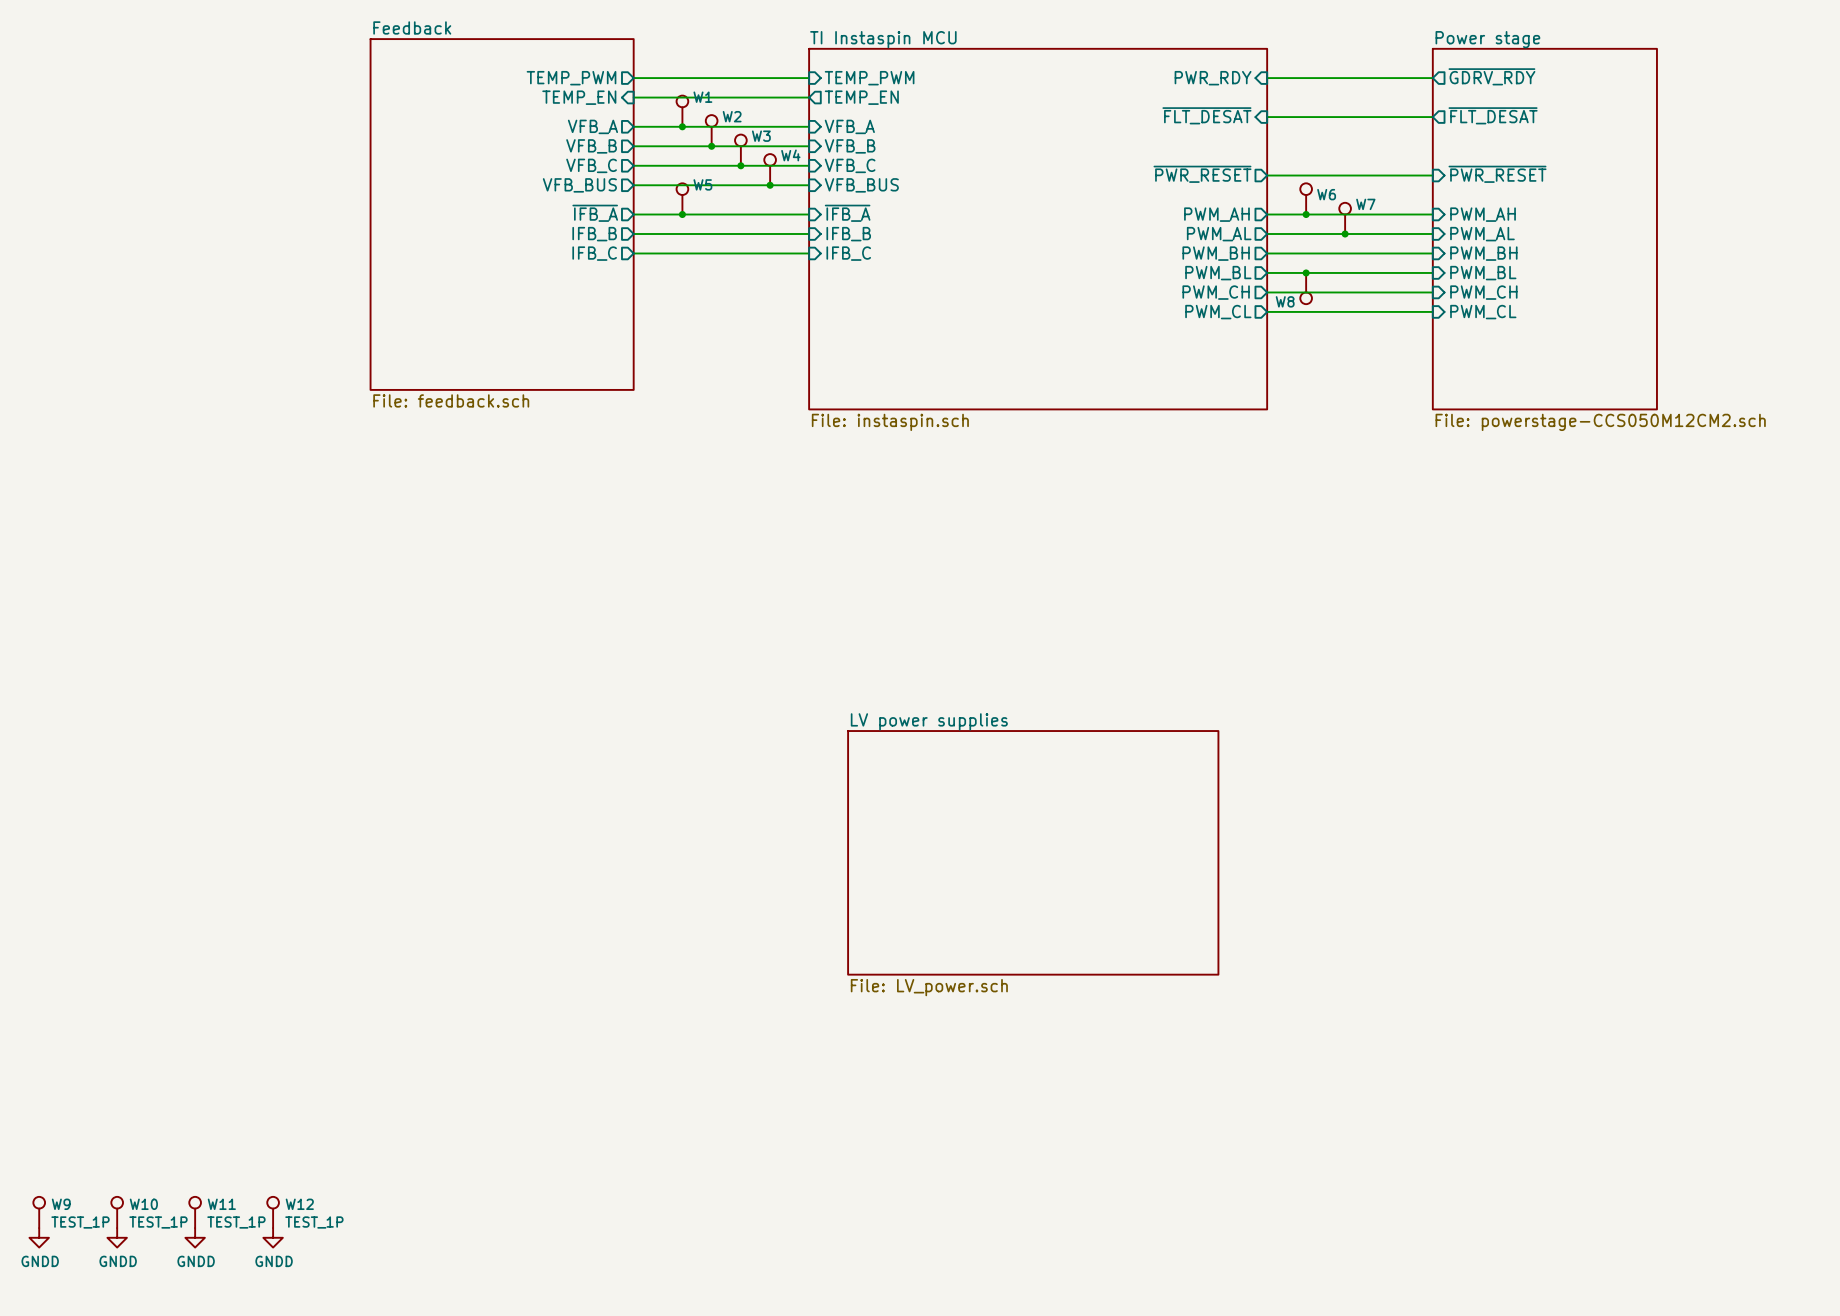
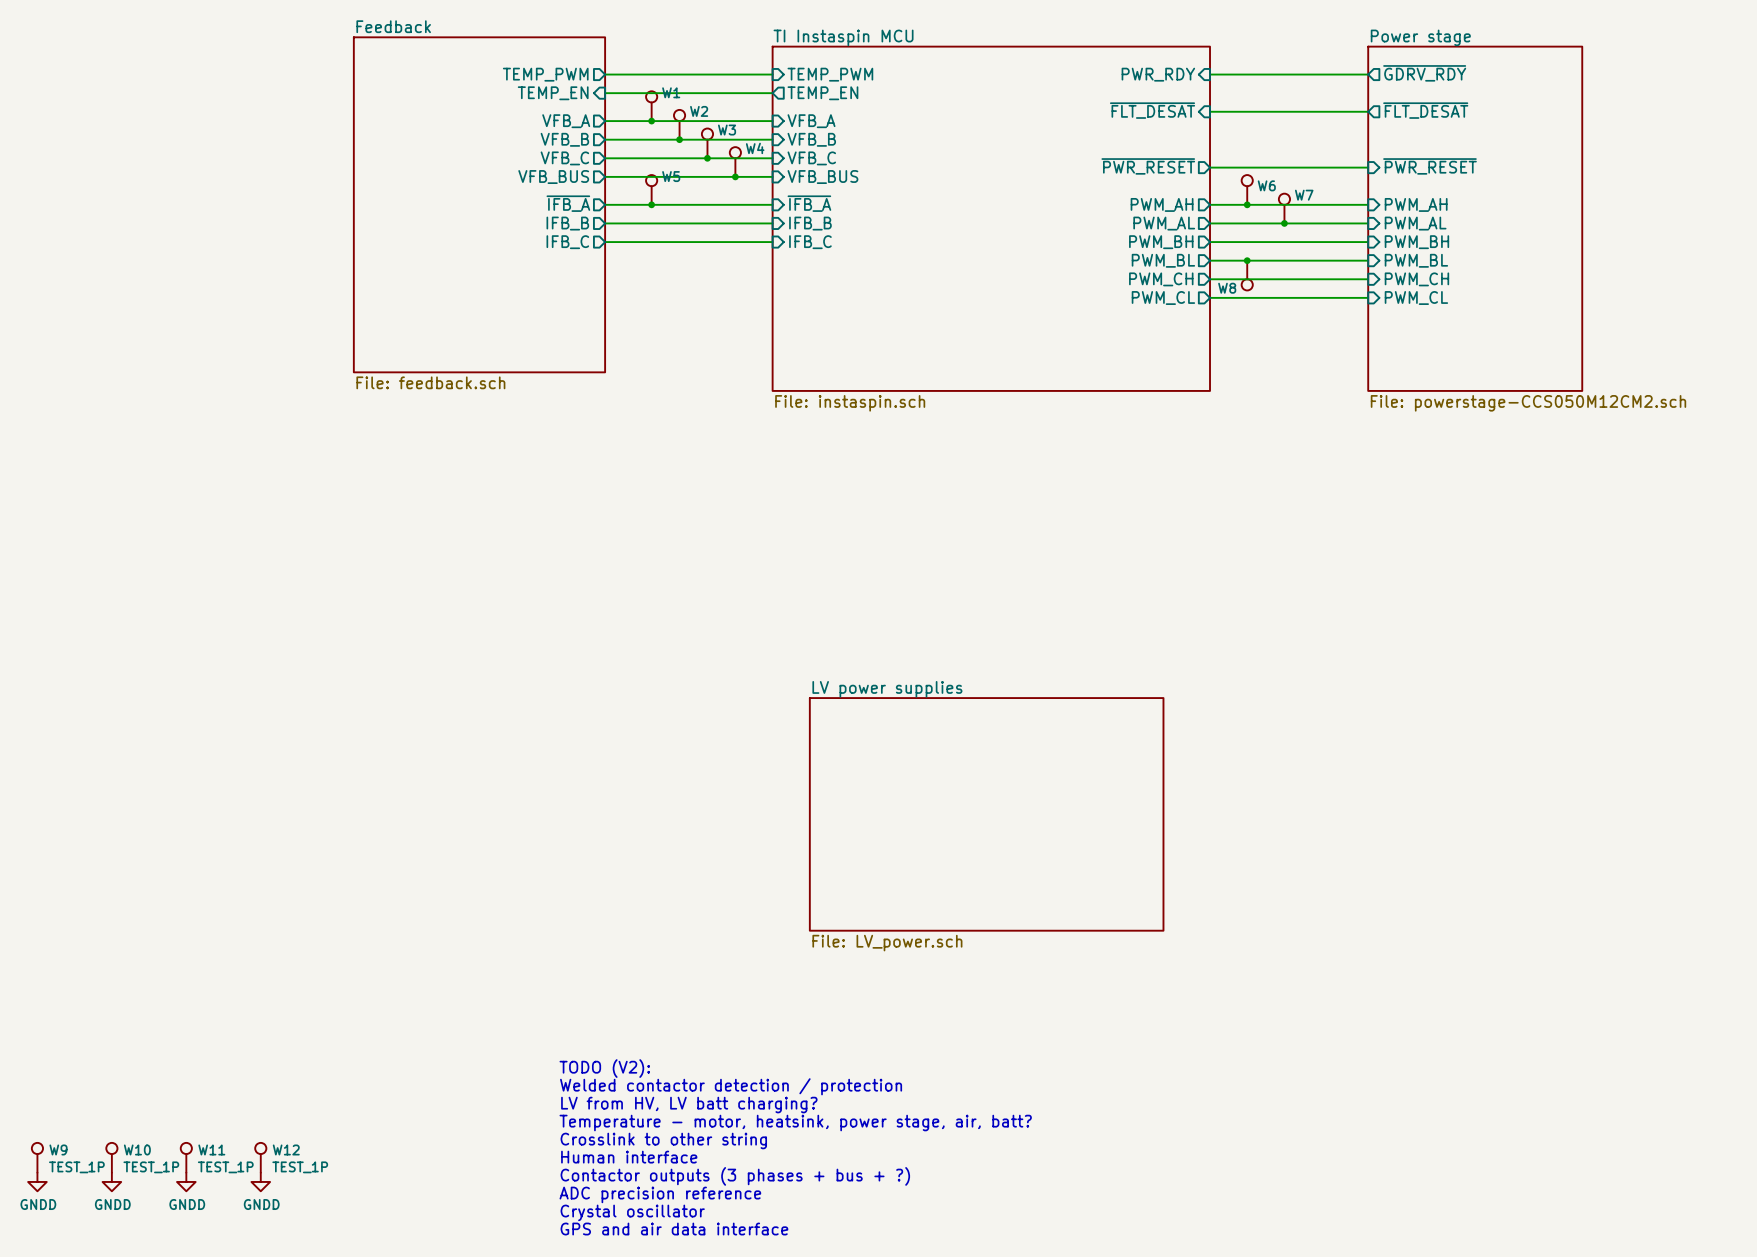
text: none -> TODO (V2): (604, 1068)
text: none -> Welded contactor detection / protection (731, 1086)
text: none -> LV from HV, LV batt charging? (689, 1105)
text: none -> Temperature - motor, heatsink, power stage, air, batt? (795, 1123)
text: none -> Crosslink to other string (663, 1140)
text: none -> Human interface (629, 1157)
text: none -> Contactor outputs (3 phases + bus + ?) (735, 1176)
text: none -> ADC precision reference (660, 1194)
text: none -> Crystal oscillator (632, 1212)
text: none -> GPS and air data interface (674, 1229)

